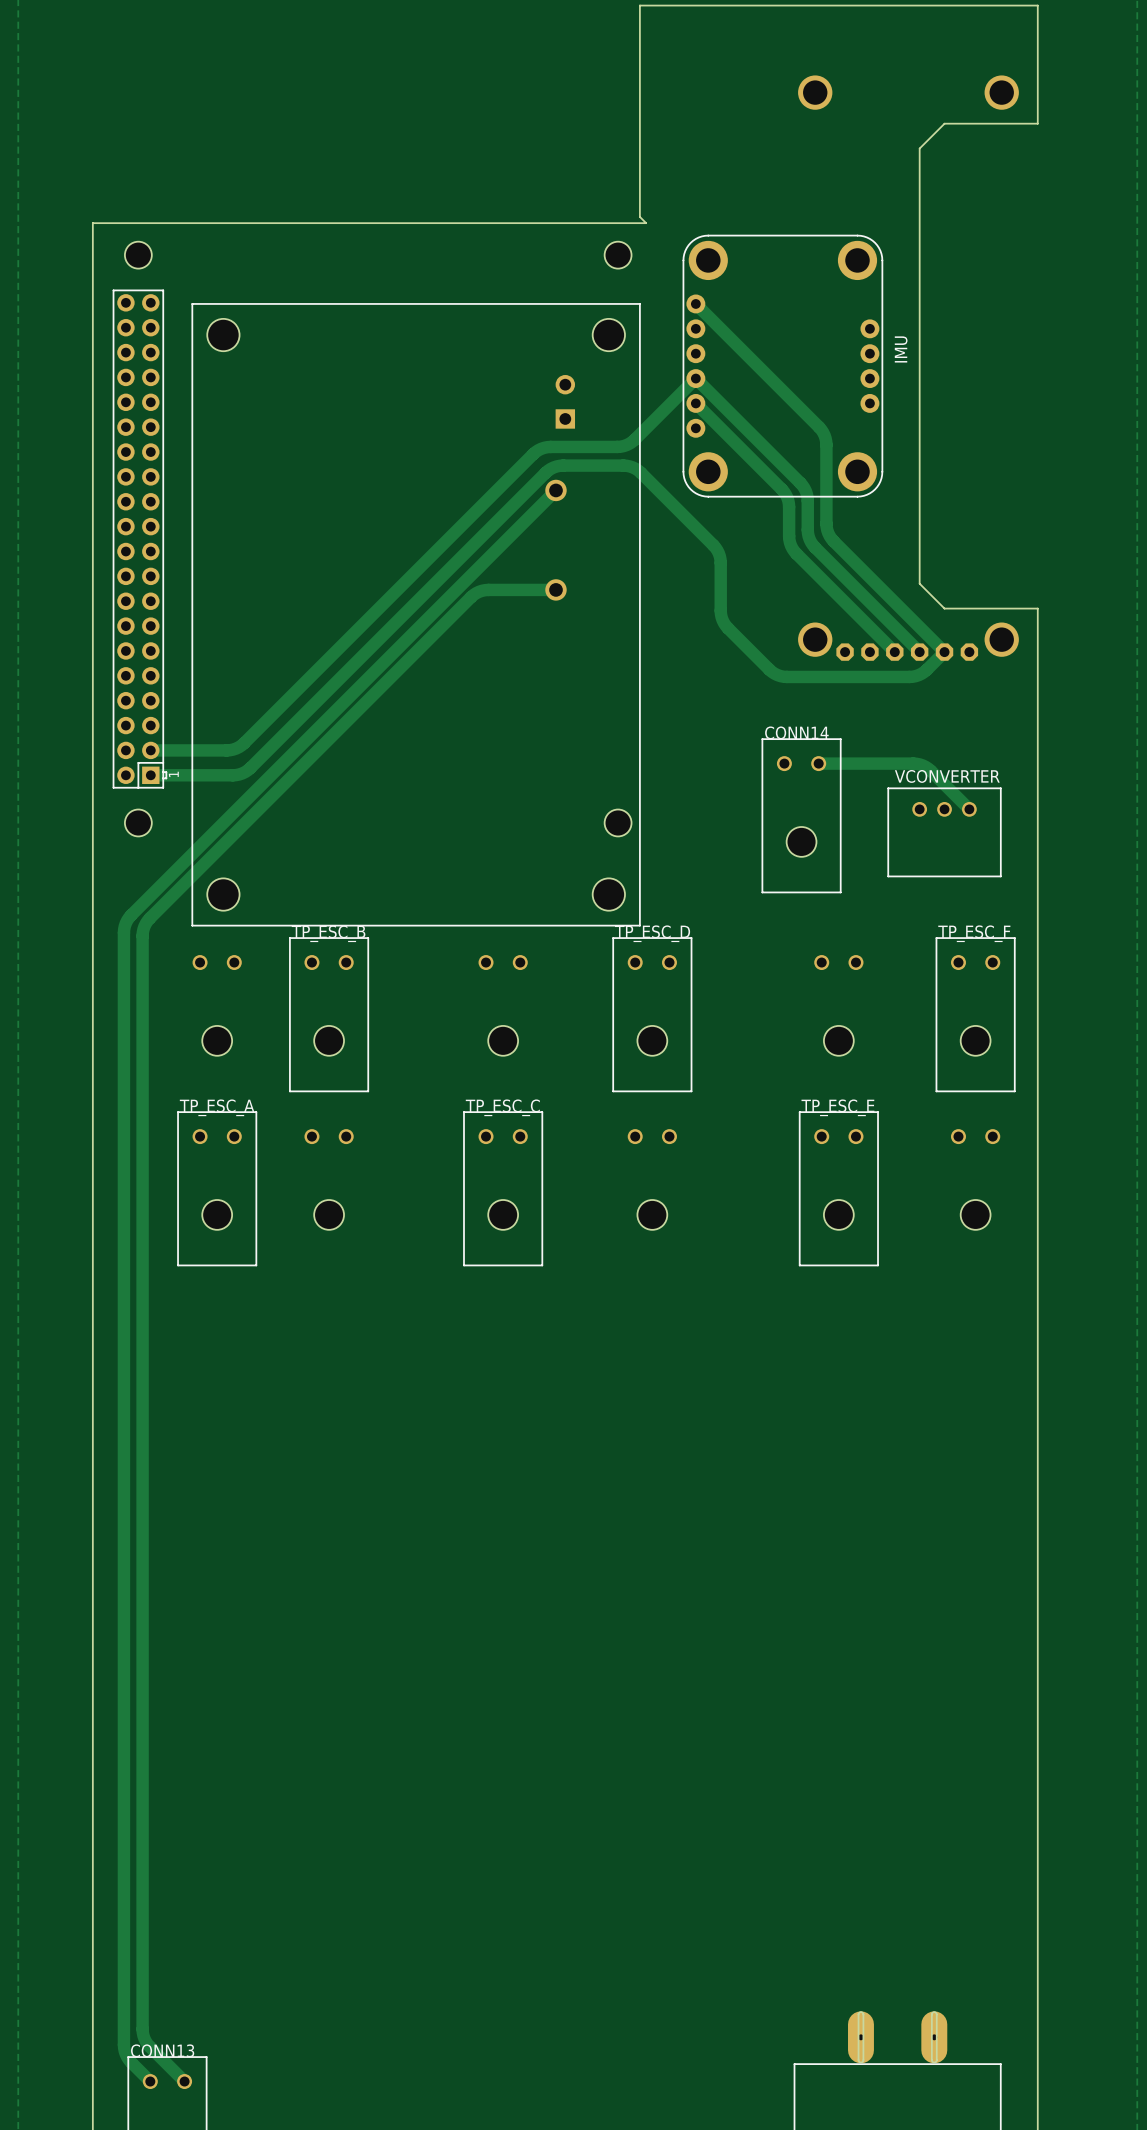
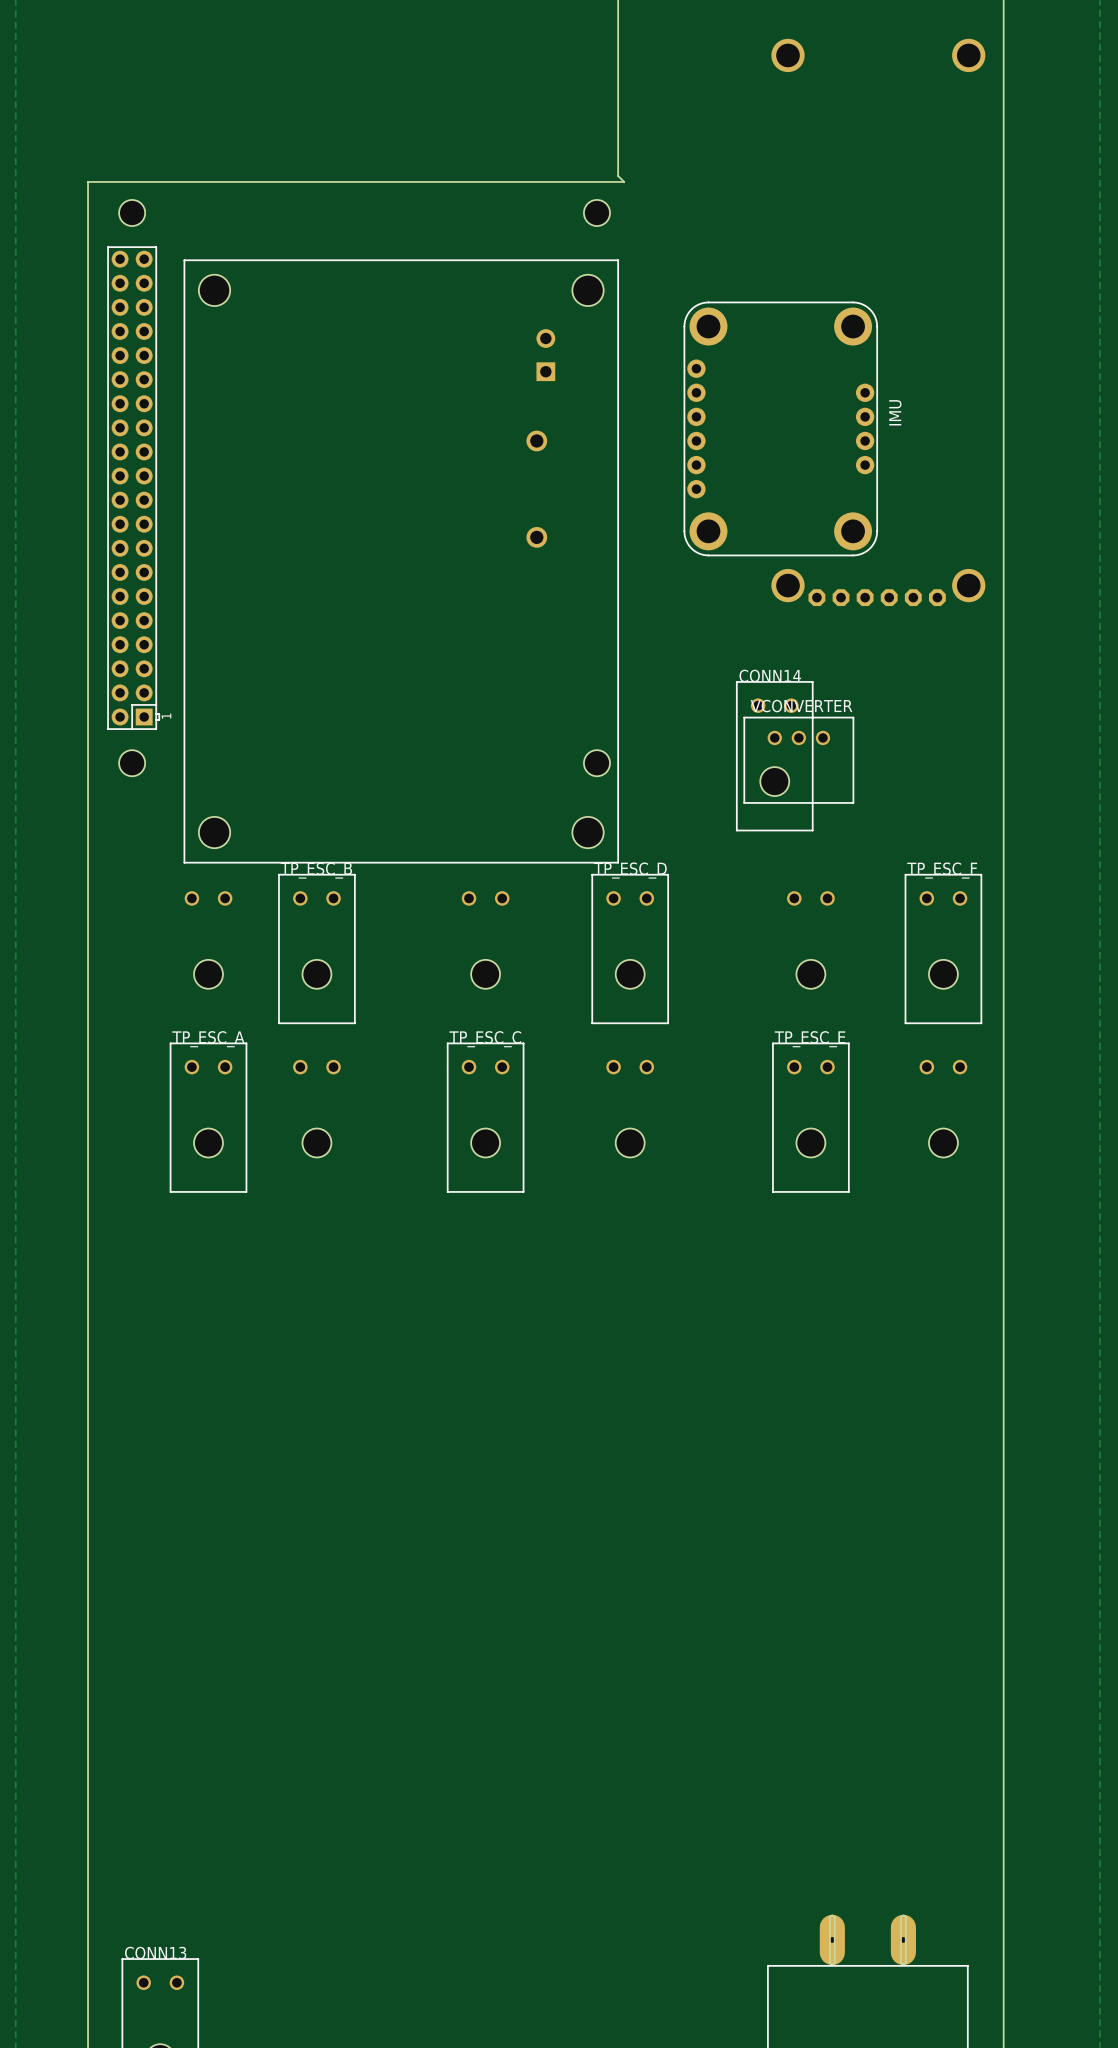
board edge: (1037, 123) (944, 123) (919, 148) (919, 583) (944, 608) (1037, 608) -> (1003, 85) (1003, 555)
track: (695, 303) (823, 432) (826, 444) (826, 523) (828, 533) (833, 541) (944, 652) (924, 671) (909, 676) (786, 676) (774, 673) (728, 628) (722, 620) (720, 610) (720, 559) (717, 550) (640, 472) (626, 465) (559, 465) (545, 472) (248, 770) (232, 775) (150, 775) -> none
IMU position: (782, 366) -> (780, 428)
track: (695, 403) (785, 494) (788, 503) (789, 539) (794, 551) (894, 652) -> none
track: (555, 490) (131, 915) (124, 926) (123, 2044) (129, 2059) (150, 2081) -> none
track: (555, 589) (488, 589) (473, 595) (149, 918) (143, 929) (142, 2029) (147, 2044) (184, 2081) -> none
track: (919, 652) (812, 545) (807, 533) (807, 497) (802, 485) (695, 378) (634, 439) (626, 445) (617, 446) (547, 447) (535, 452) (241, 745) (226, 750) (150, 750) -> none
track: (818, 763) (919, 764) (930, 770) (969, 809) -> none
VCONVERTER position: (944, 832) -> (798, 760)

